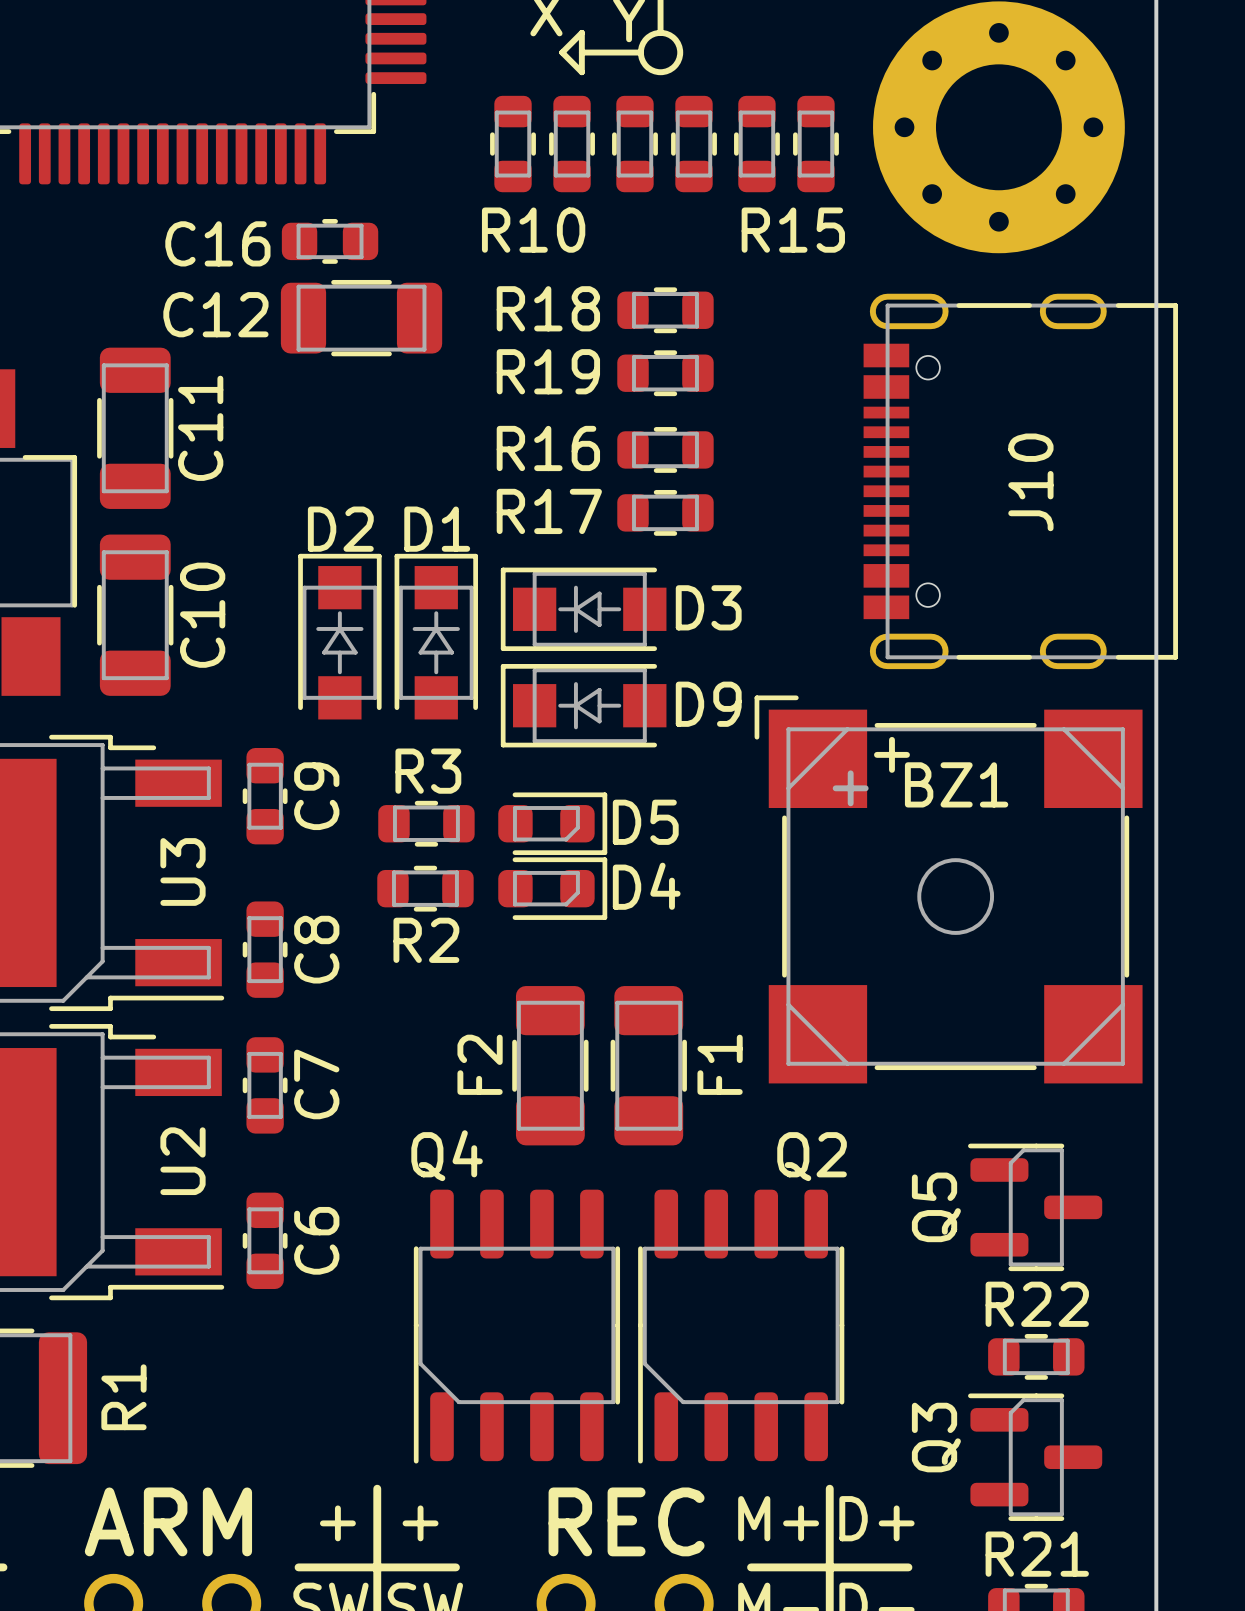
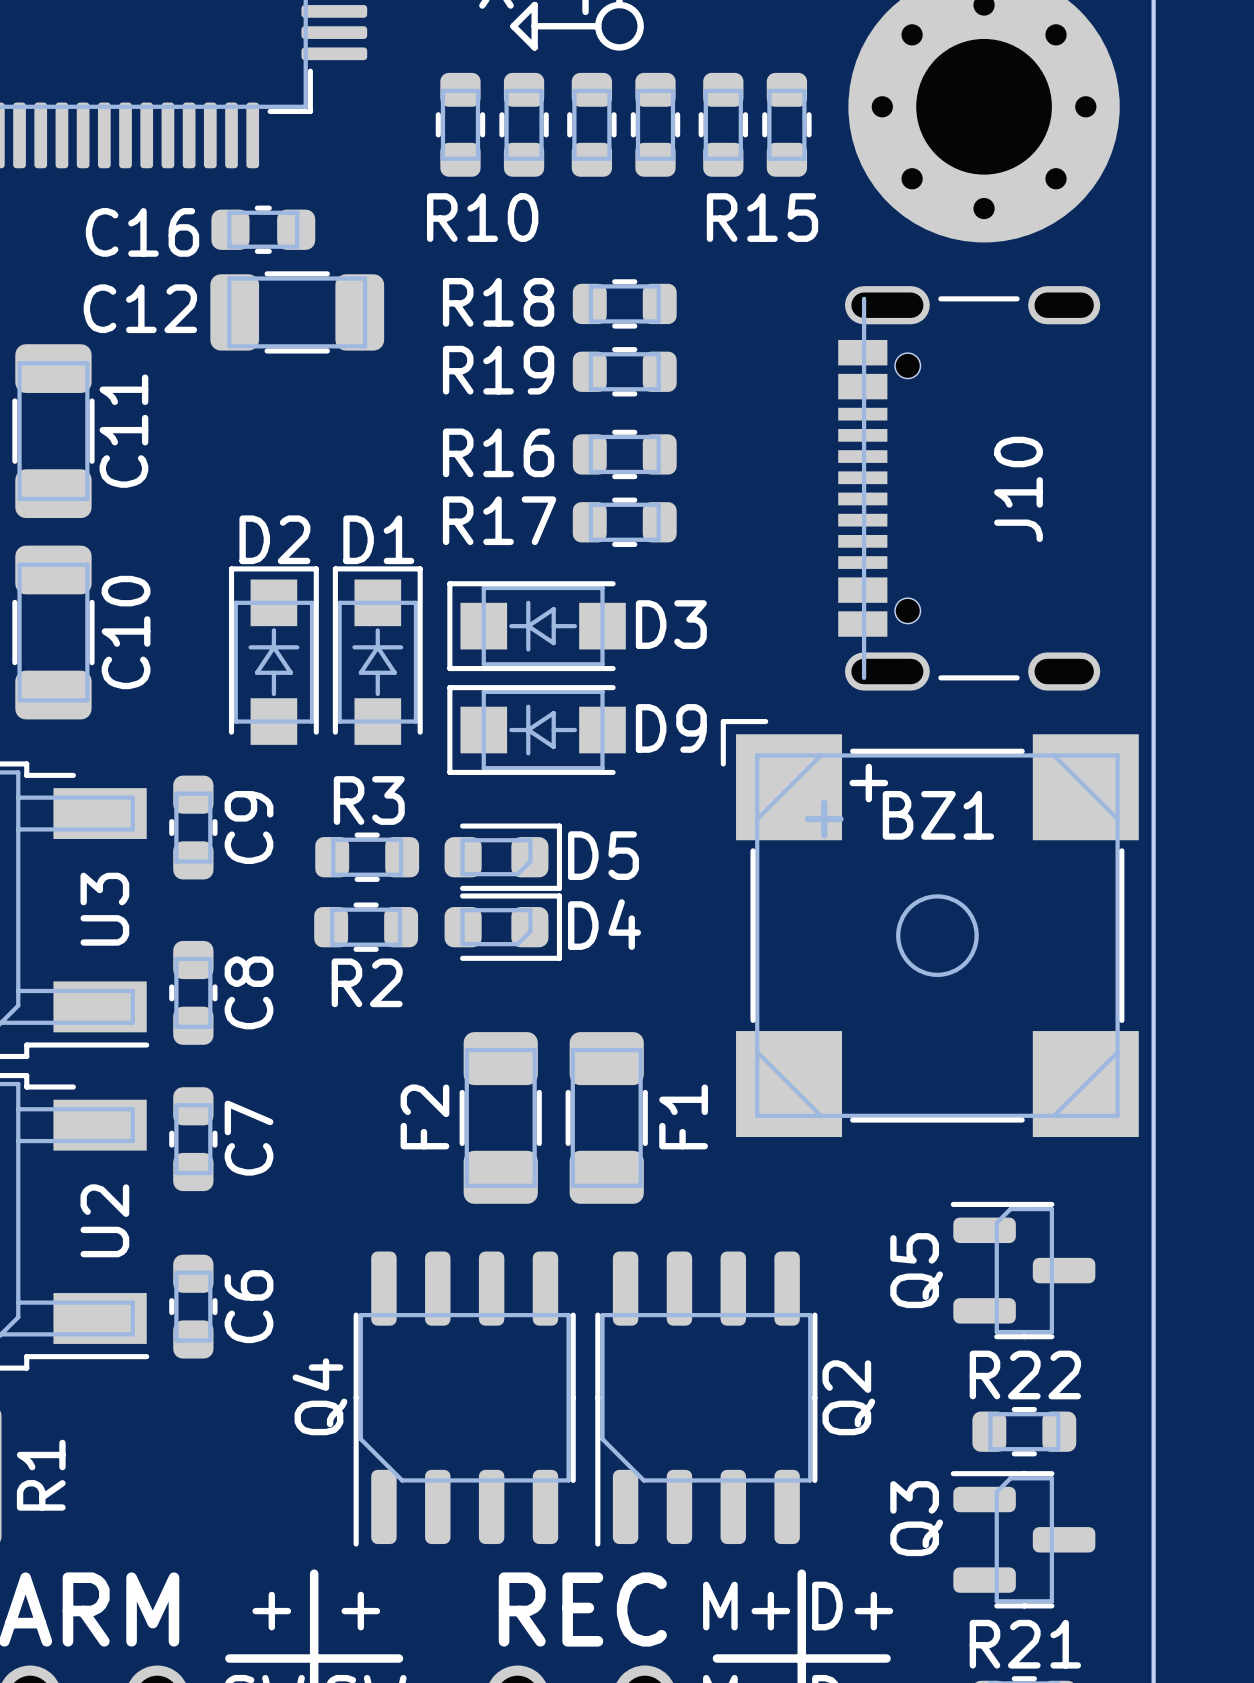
J10 footprint: [863, 293, 1178, 670] -> [838, 286, 1101, 691]
Q4 name rotation: 0° (447, 1155) -> 90° counterclockwise (319, 1396)
Q4 name position: Q4 (447, 1155) -> Q4 (319, 1396)
Q2 name rotation: 0° (812, 1156) -> 90° counterclockwise (848, 1397)
Q2 name position: Q2 (812, 1156) -> Q2 (848, 1397)

